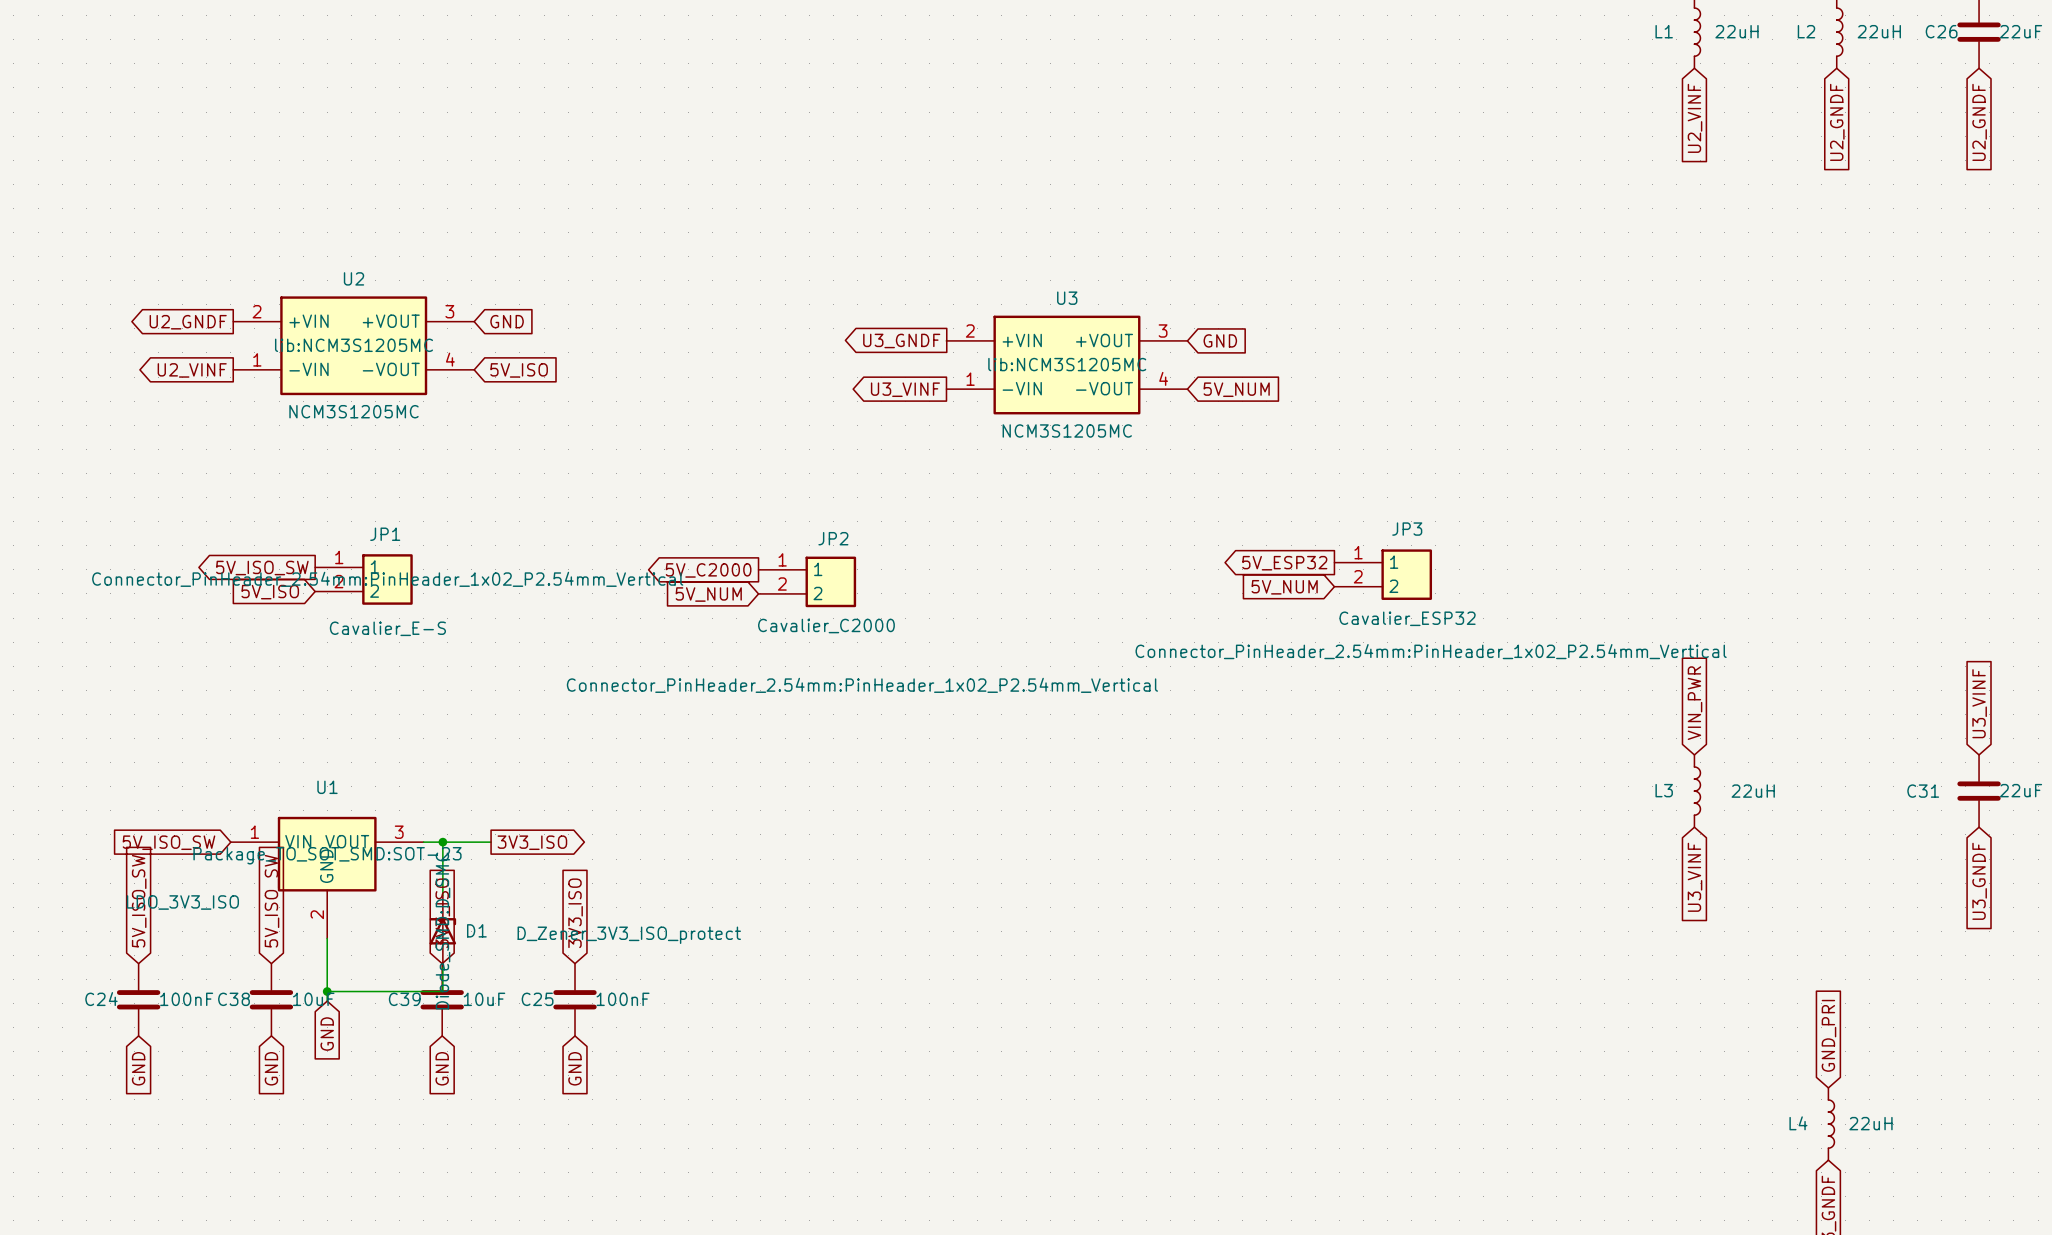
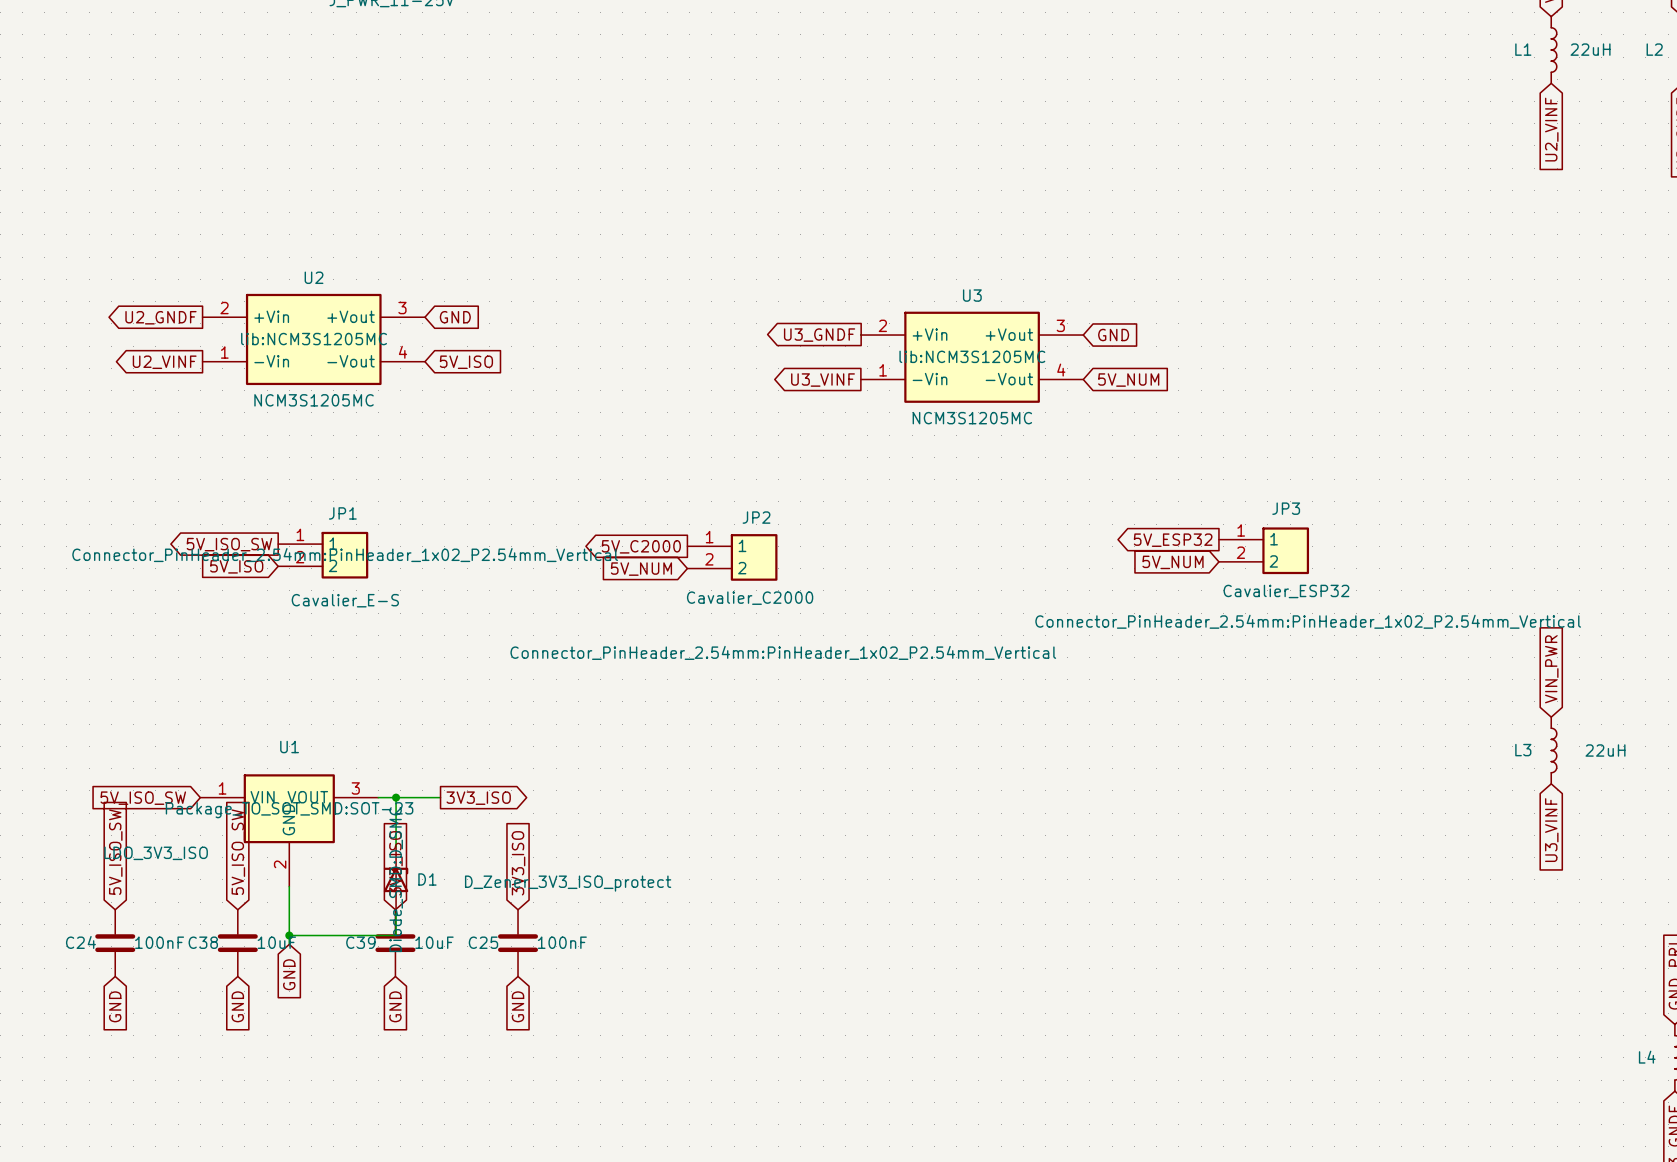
U2 pin name: +VIN (309, 321) -> +Vin (271, 316)
U2 pin name: +VOUT (391, 321) -> +Vout (351, 316)
U3 pin name: +VIN (1022, 340) -> +Vin (930, 334)
U3 pin name: +VOUT (1104, 340) -> +Vout (1009, 334)
U2 pin name: -VIN (309, 369) -> -Vin (271, 361)
U2 pin name: -VOUT (391, 369) -> -Vout (351, 361)
U3 pin name: -VIN (1022, 388) -> -Vin (930, 379)
U3 pin name: -VOUT (1104, 388) -> -Vout (1009, 379)

